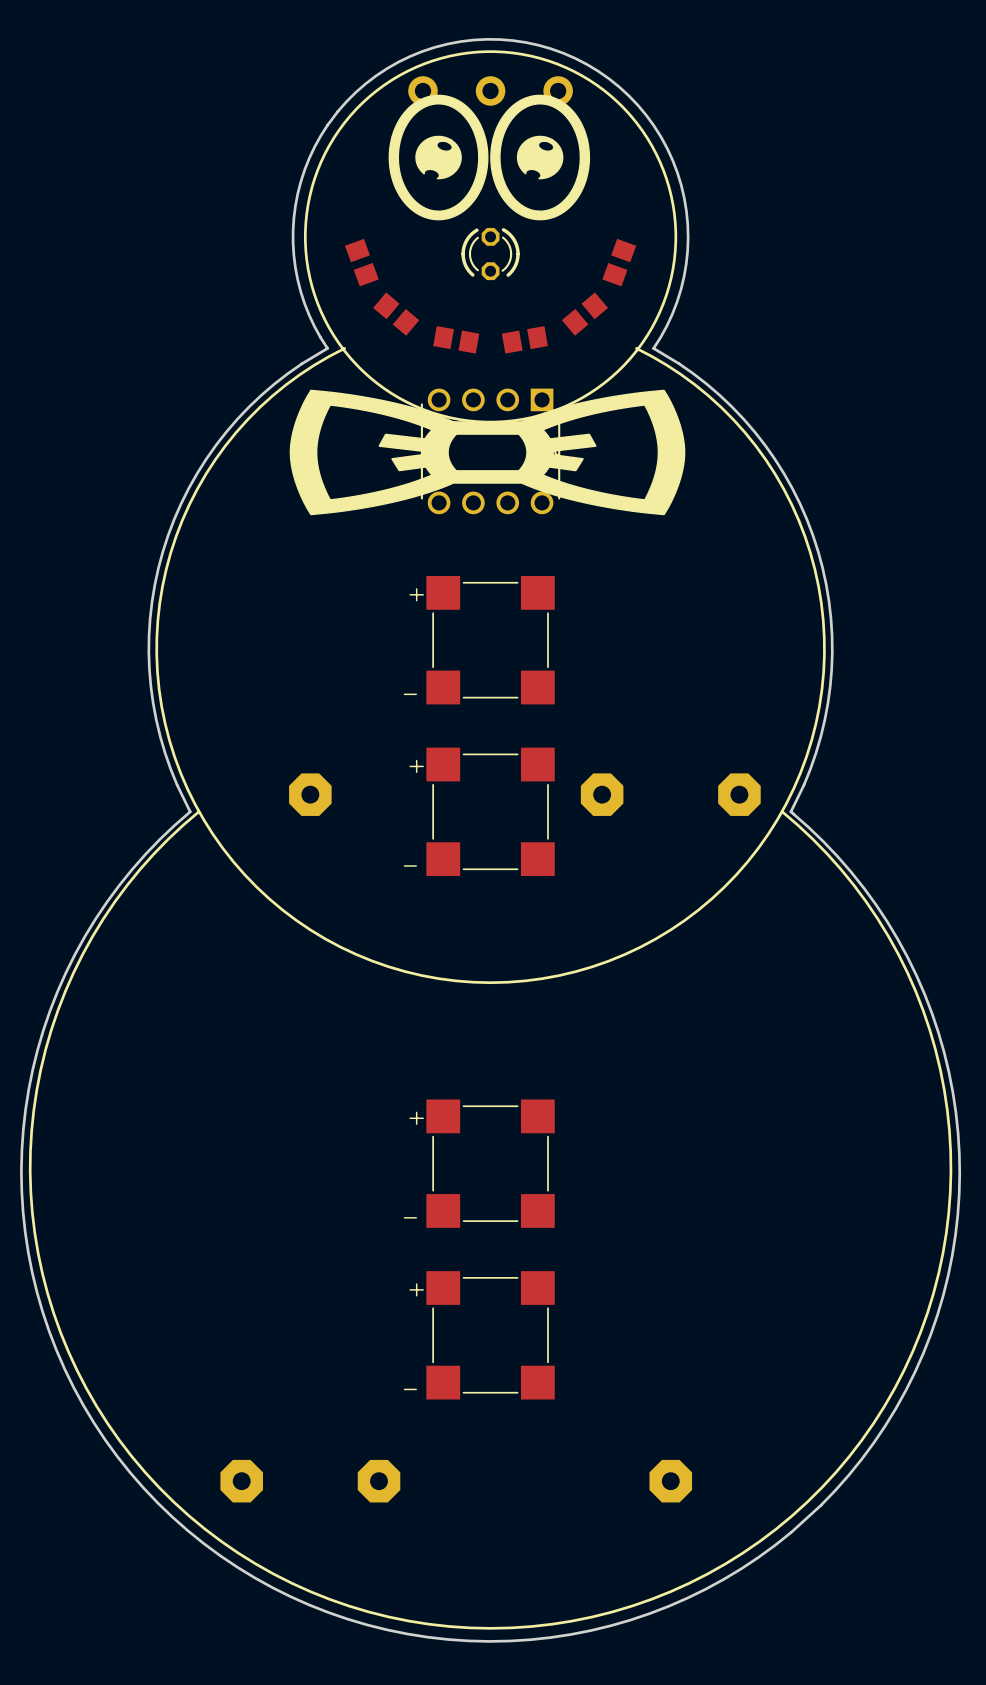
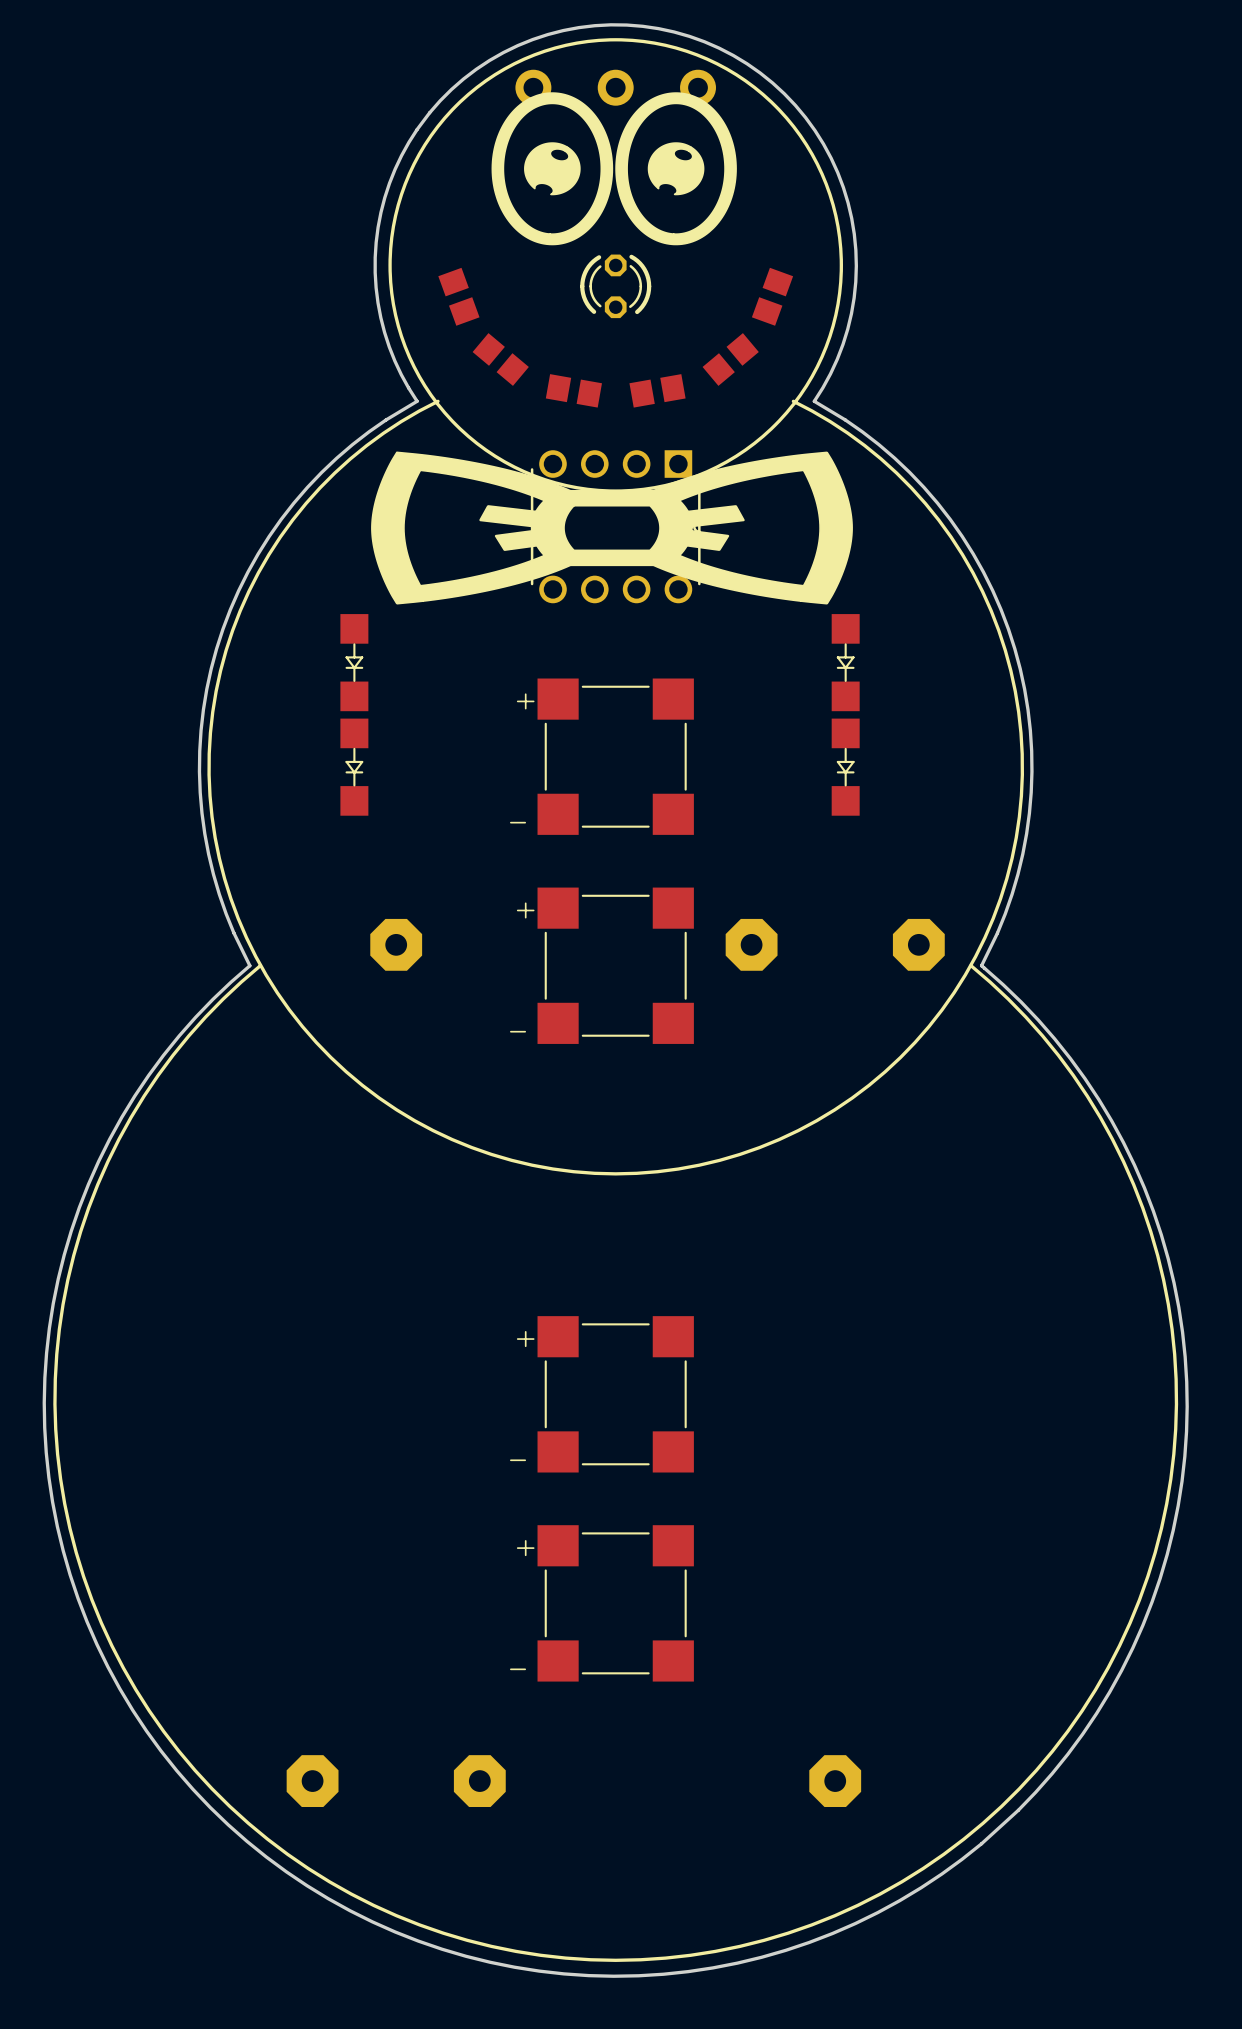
part: none -> (354, 662)
part: none -> (845, 662)
part: none -> (354, 767)
part: none -> (845, 767)

